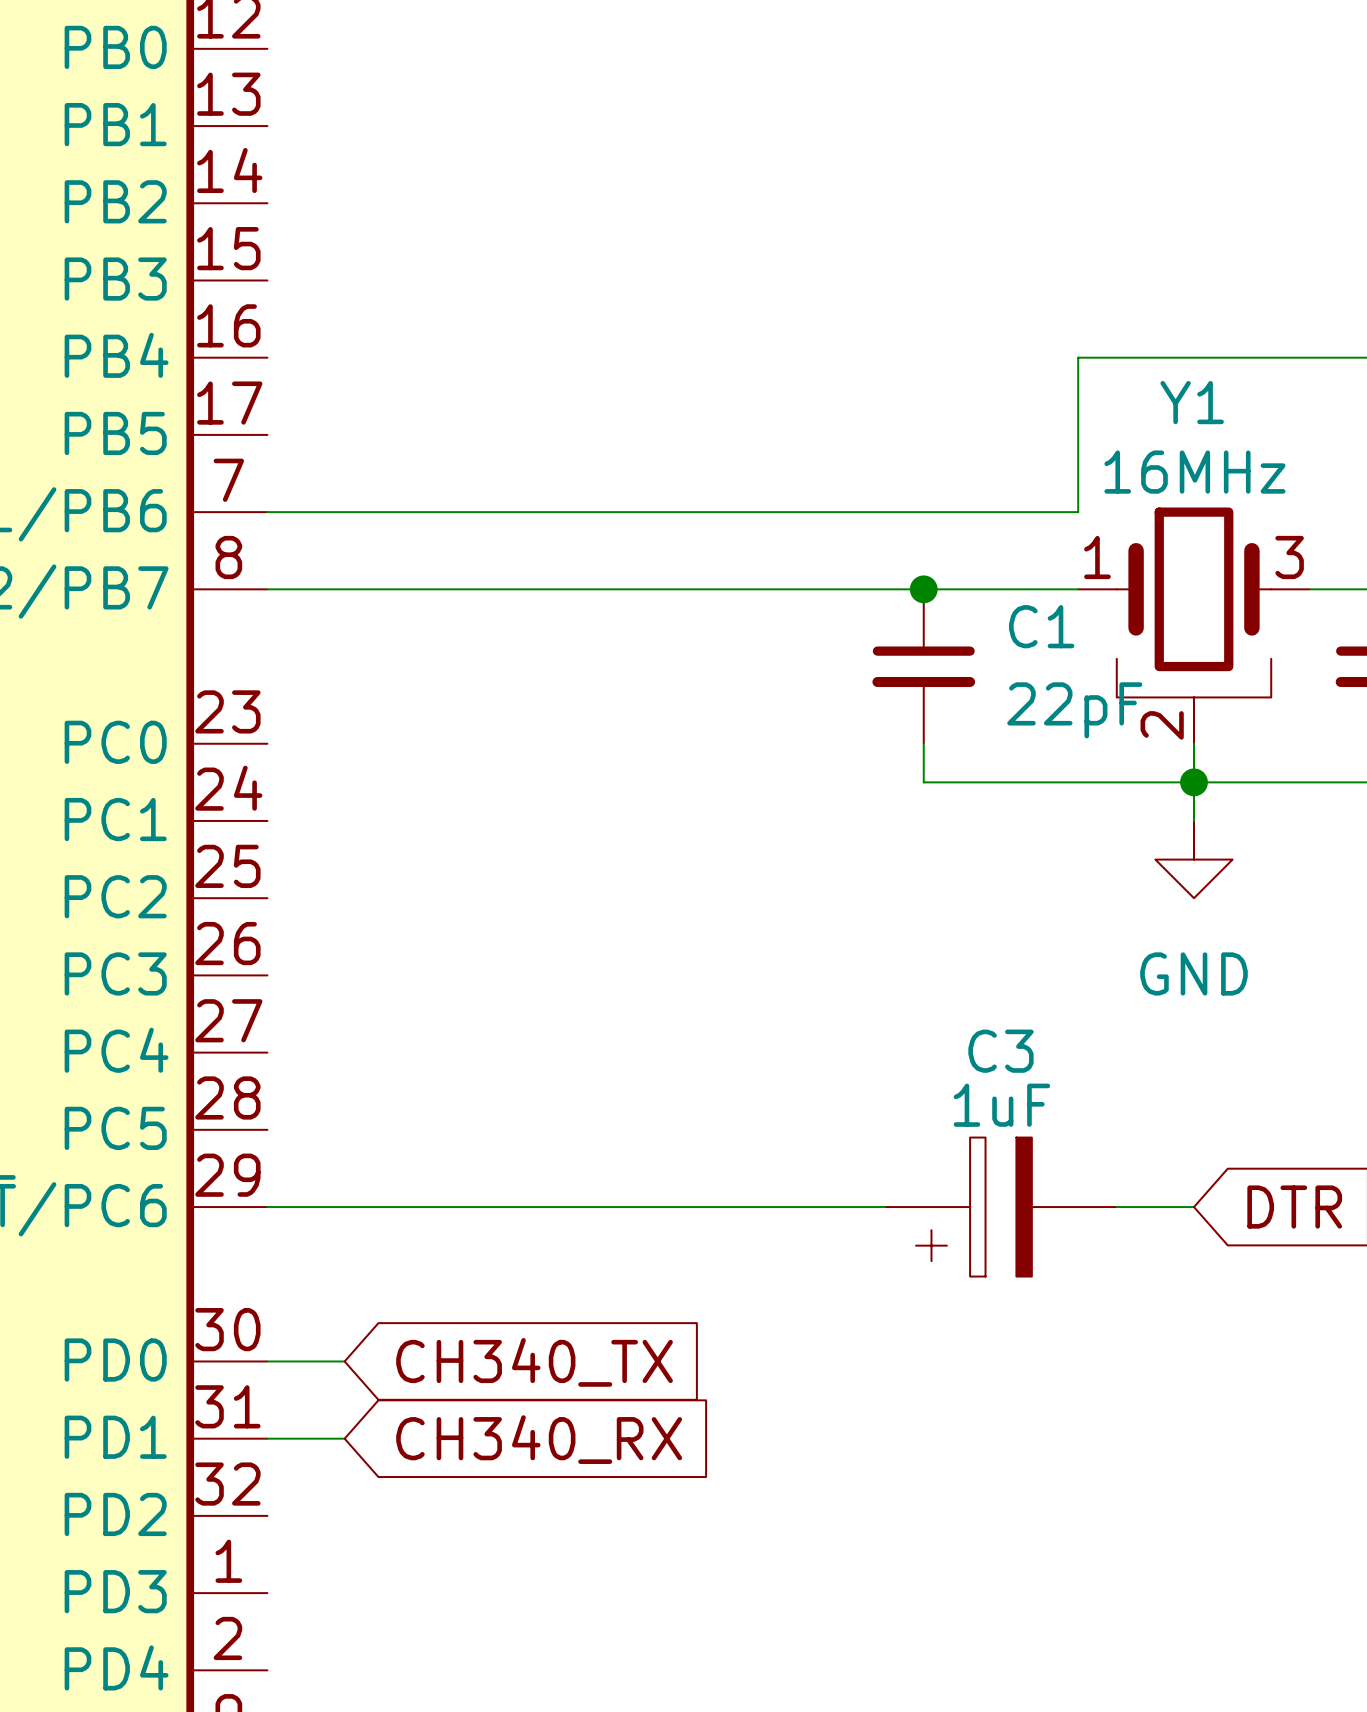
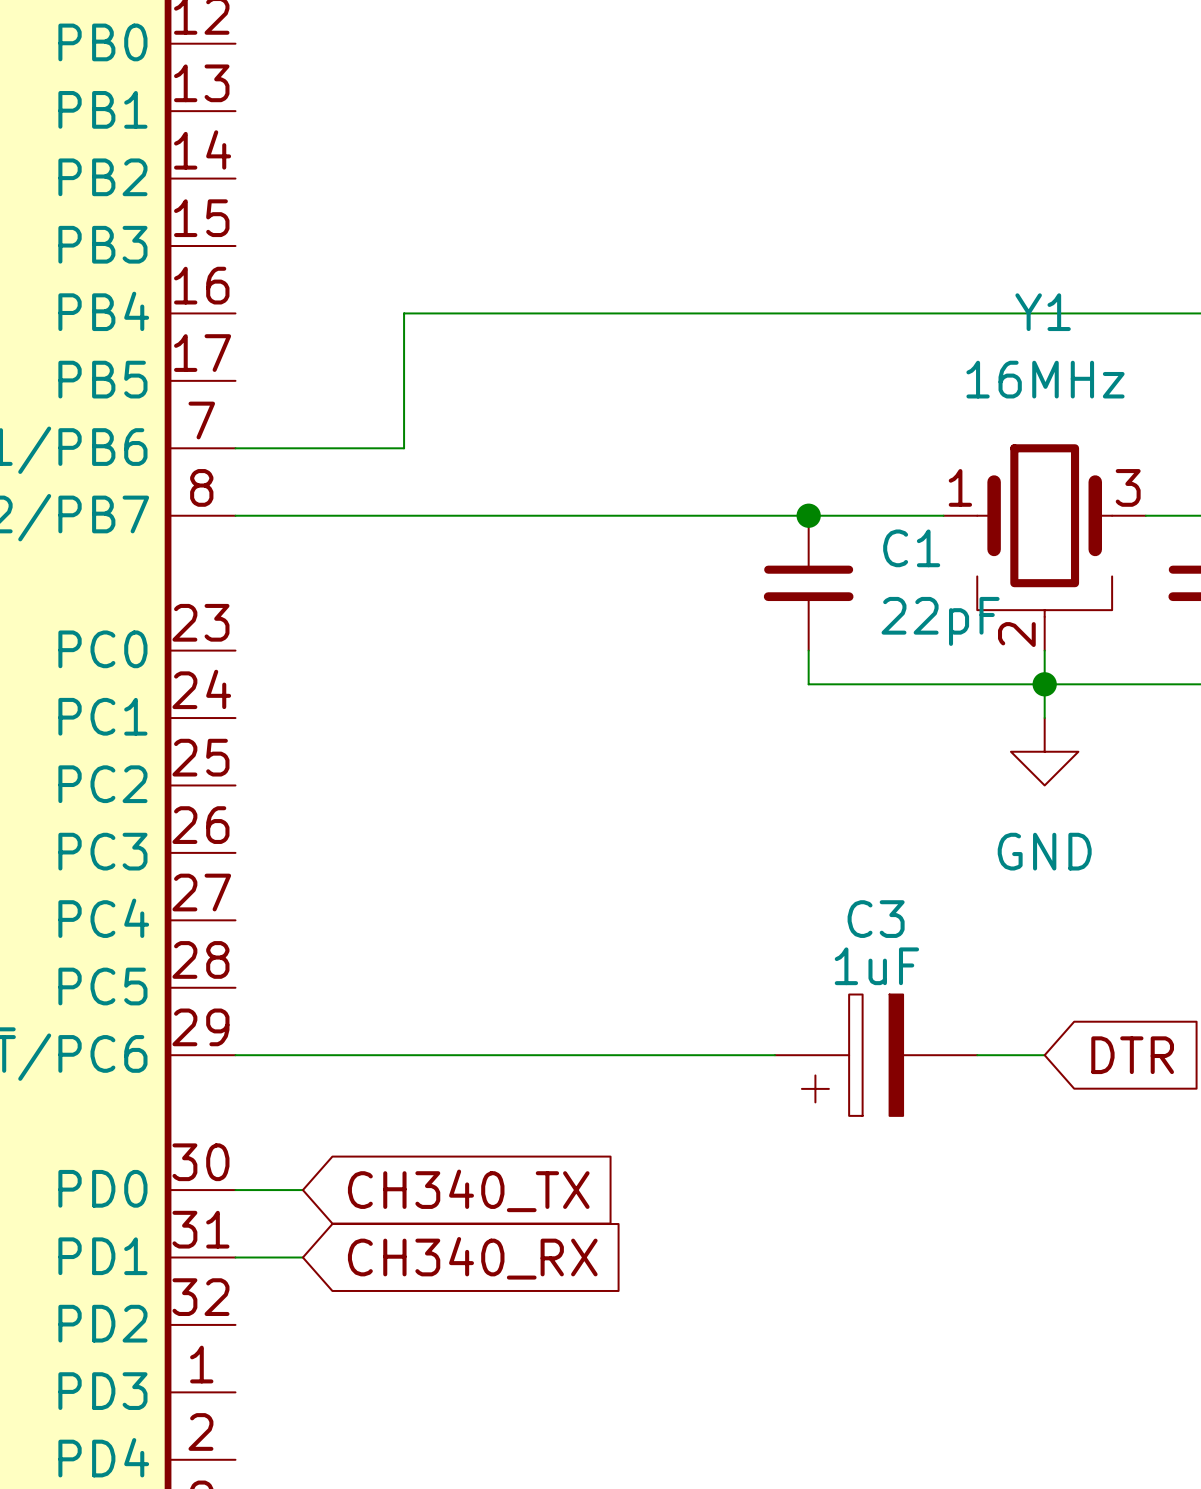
wire: (1078, 357) (1078, 512) (460, 512) -> (943, 313) (404, 313) (404, 448)
Y1 name position: Y1 (1192, 402) -> Y1 (1043, 312)
Y1 value position: 16MHz (1194, 472) -> 16MHz (1045, 379)

